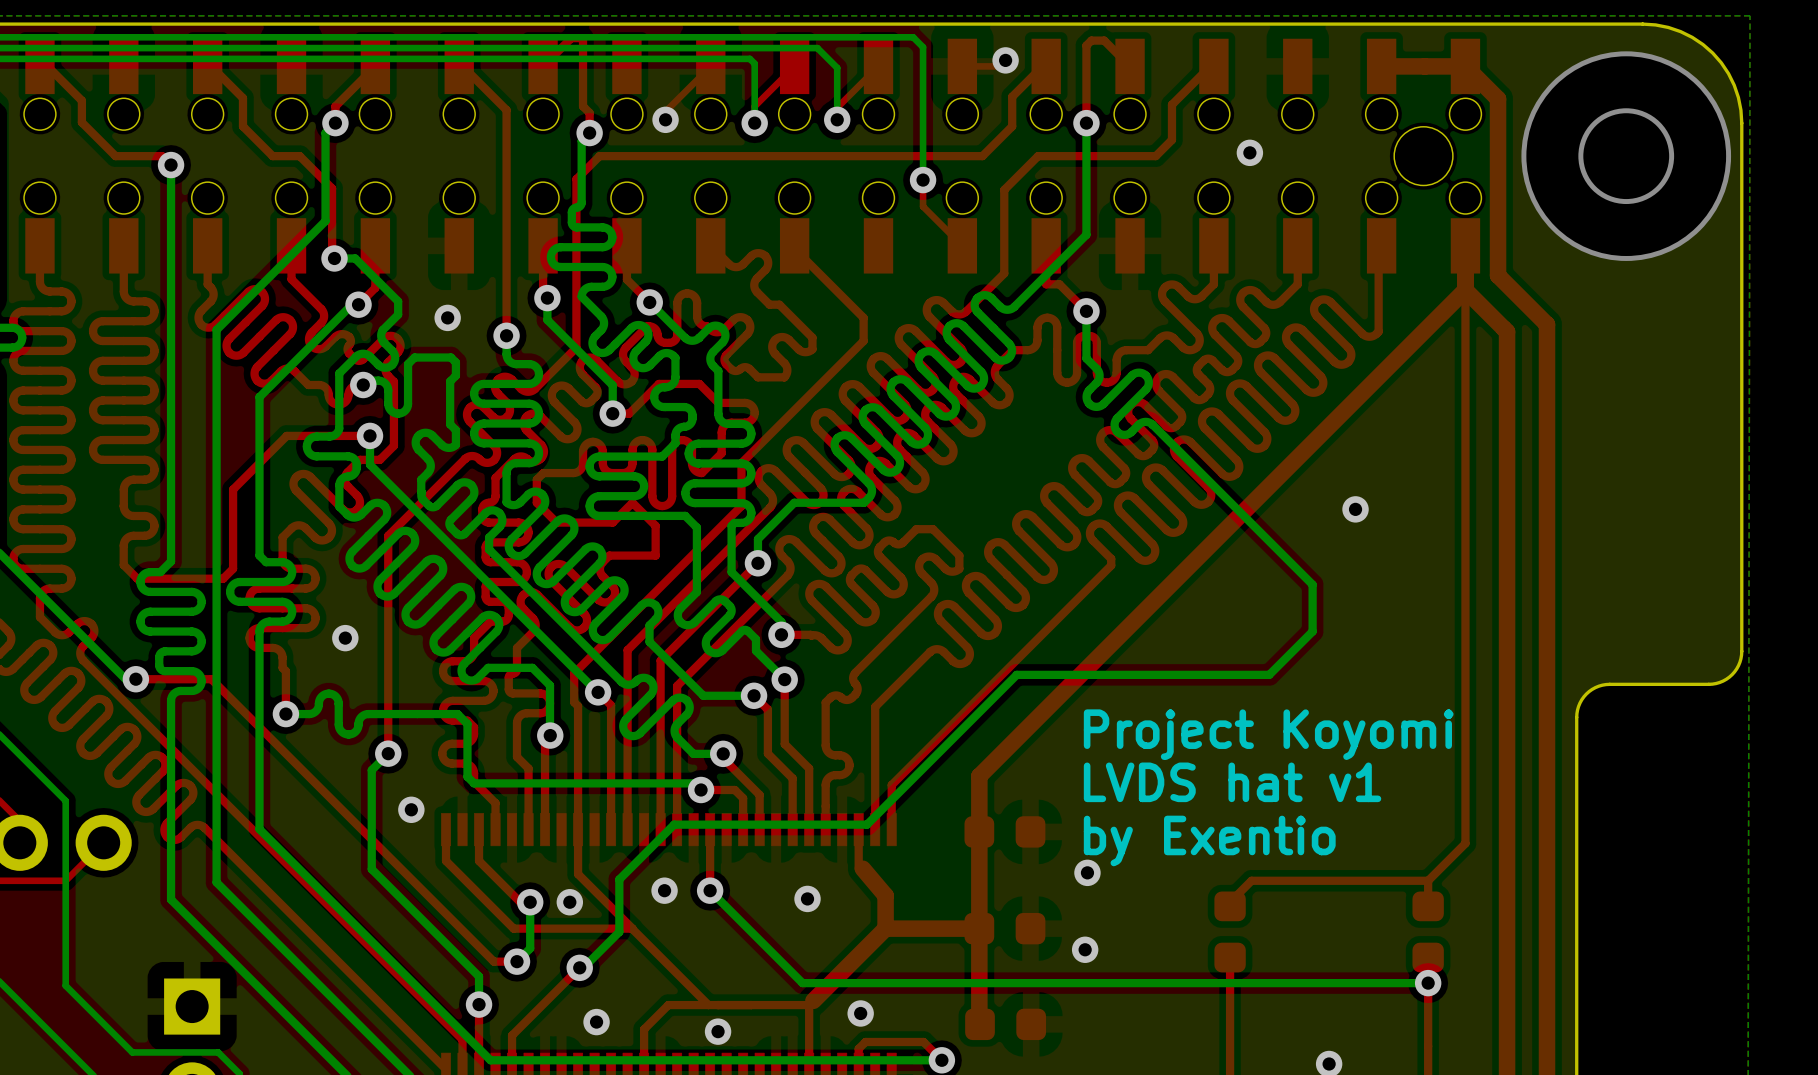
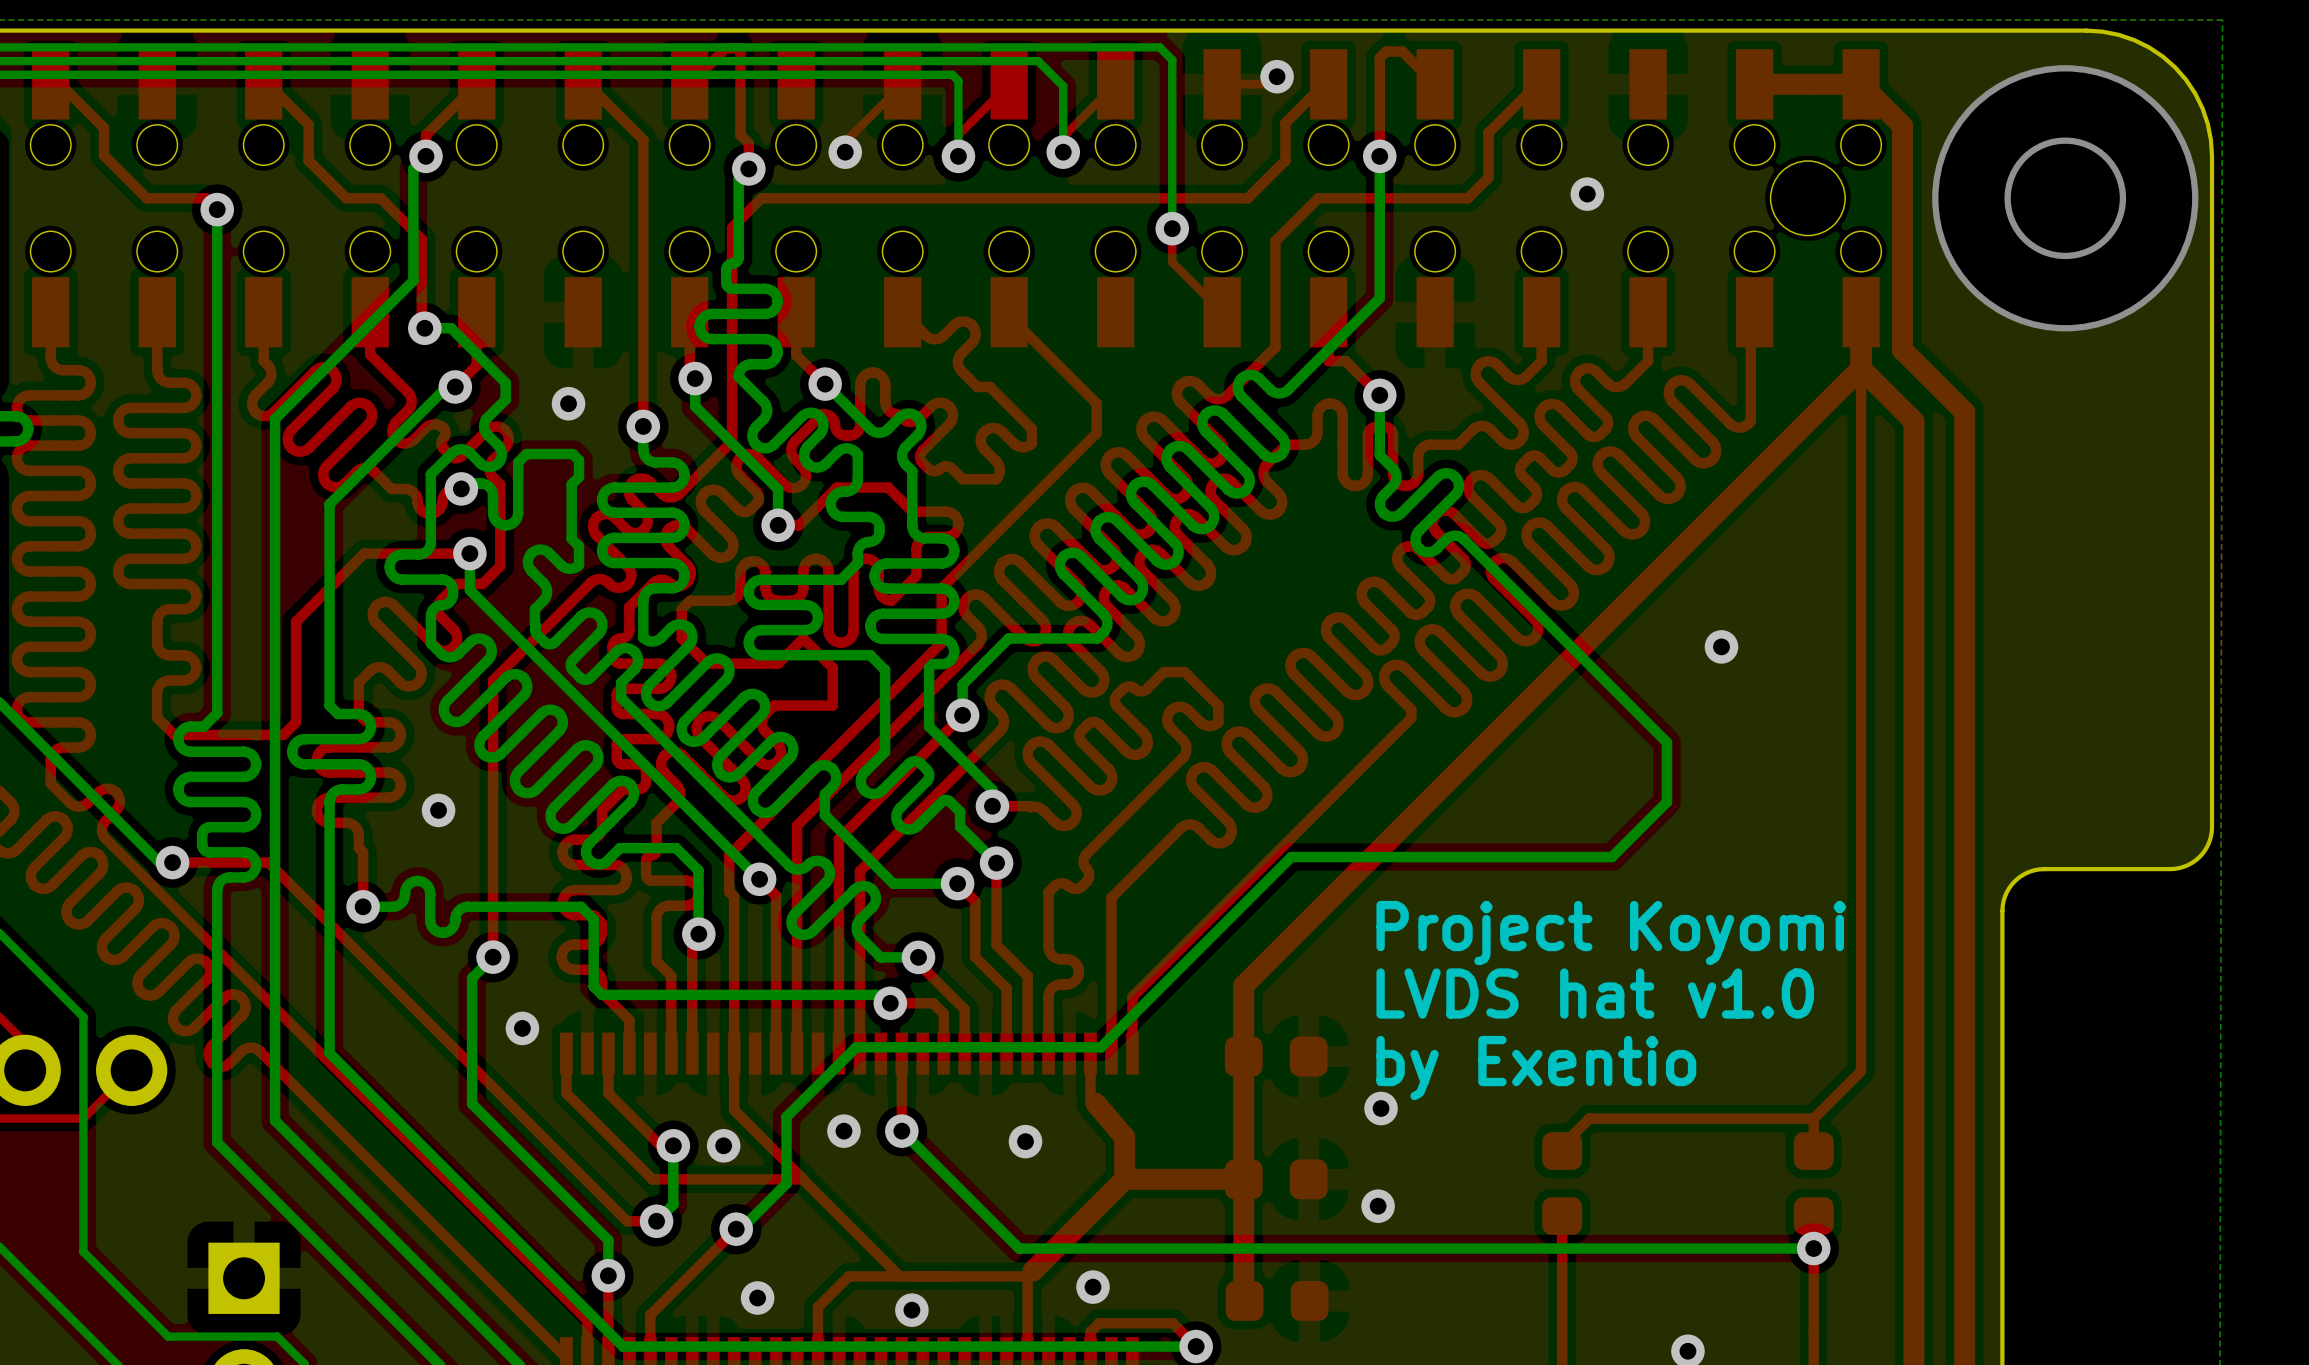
text: LVDS hat v1 (1232, 782) -> LVDS hat v1.0 (1595, 993)

